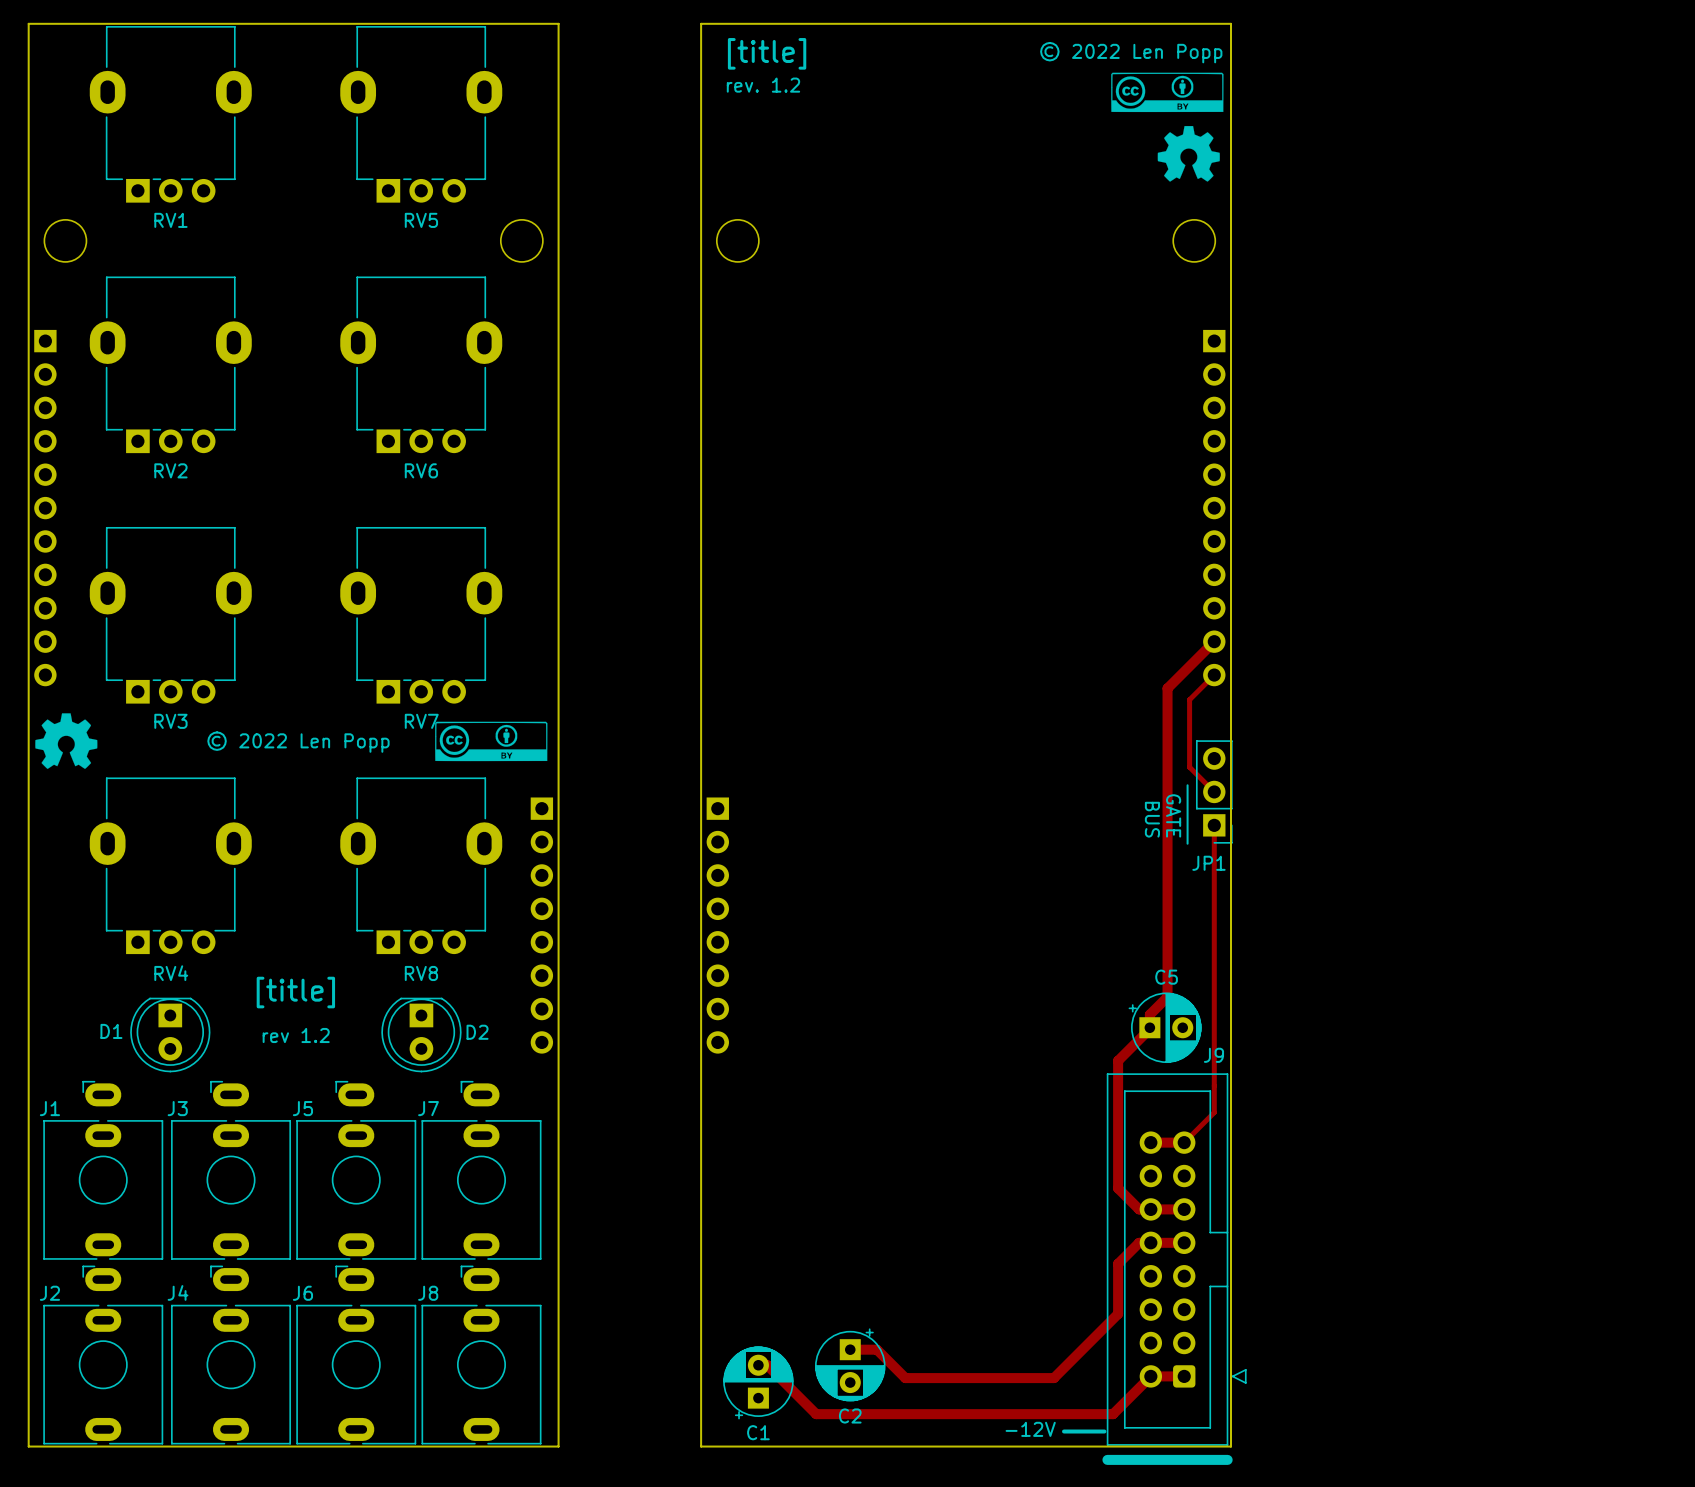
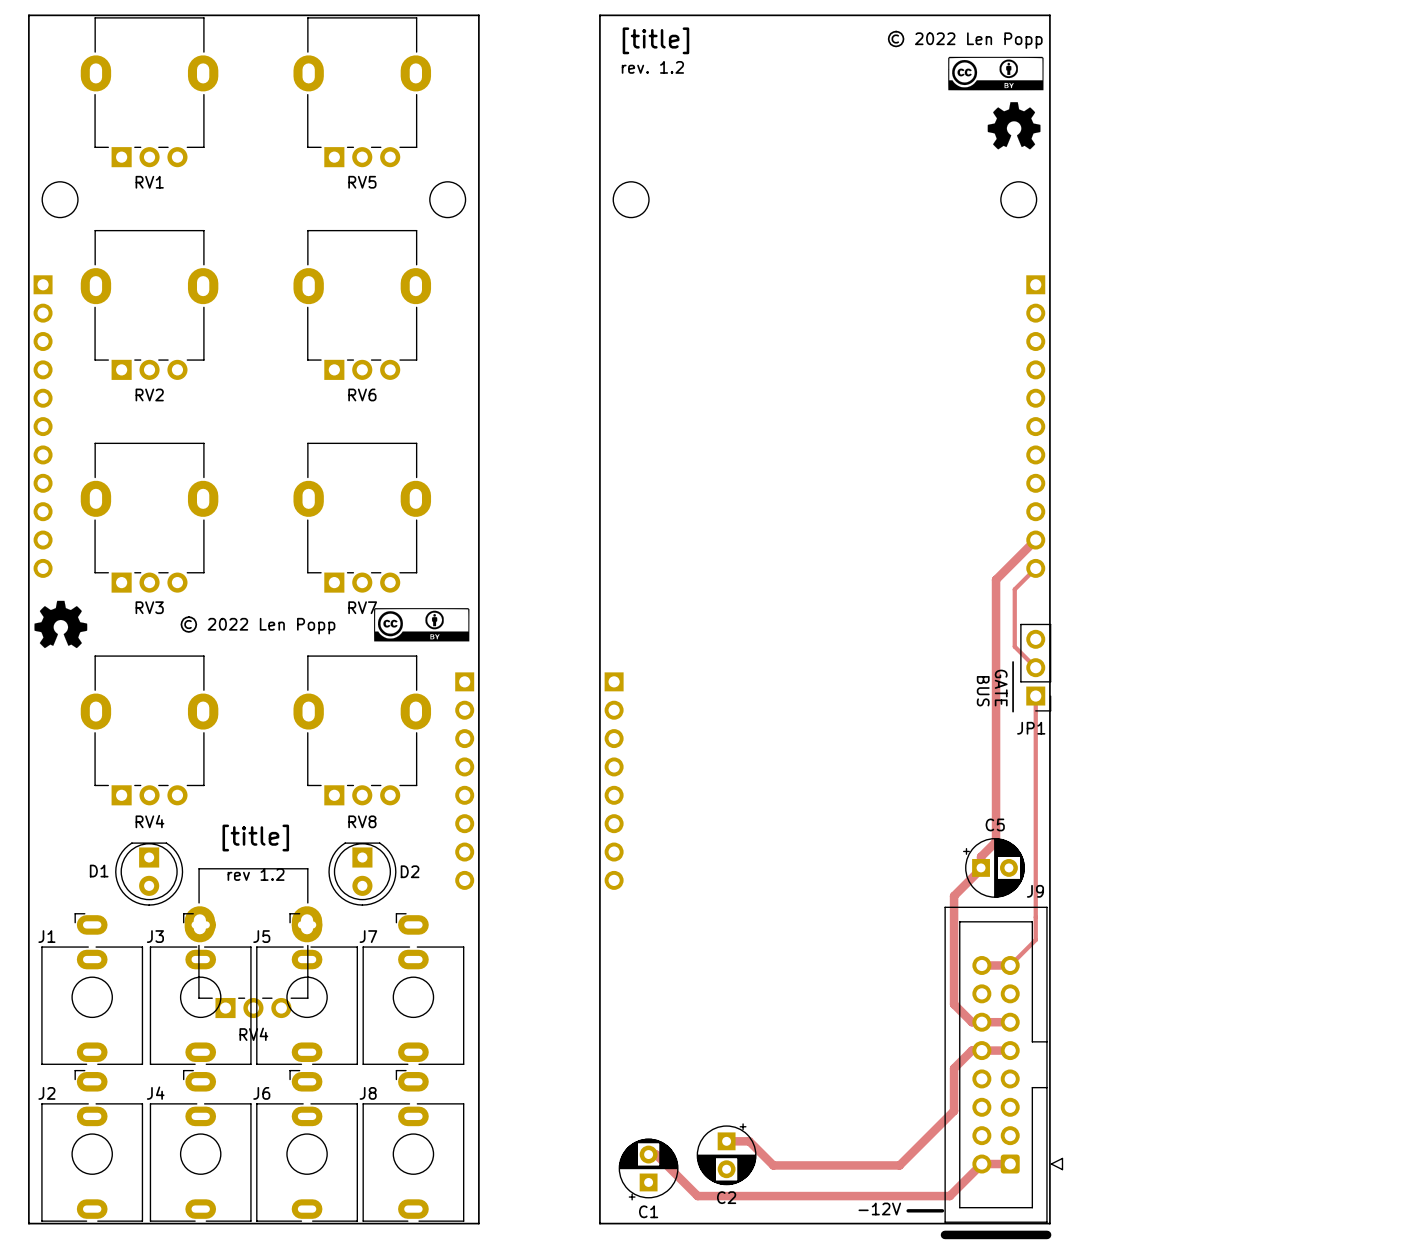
RV4: none -> (253, 943)

